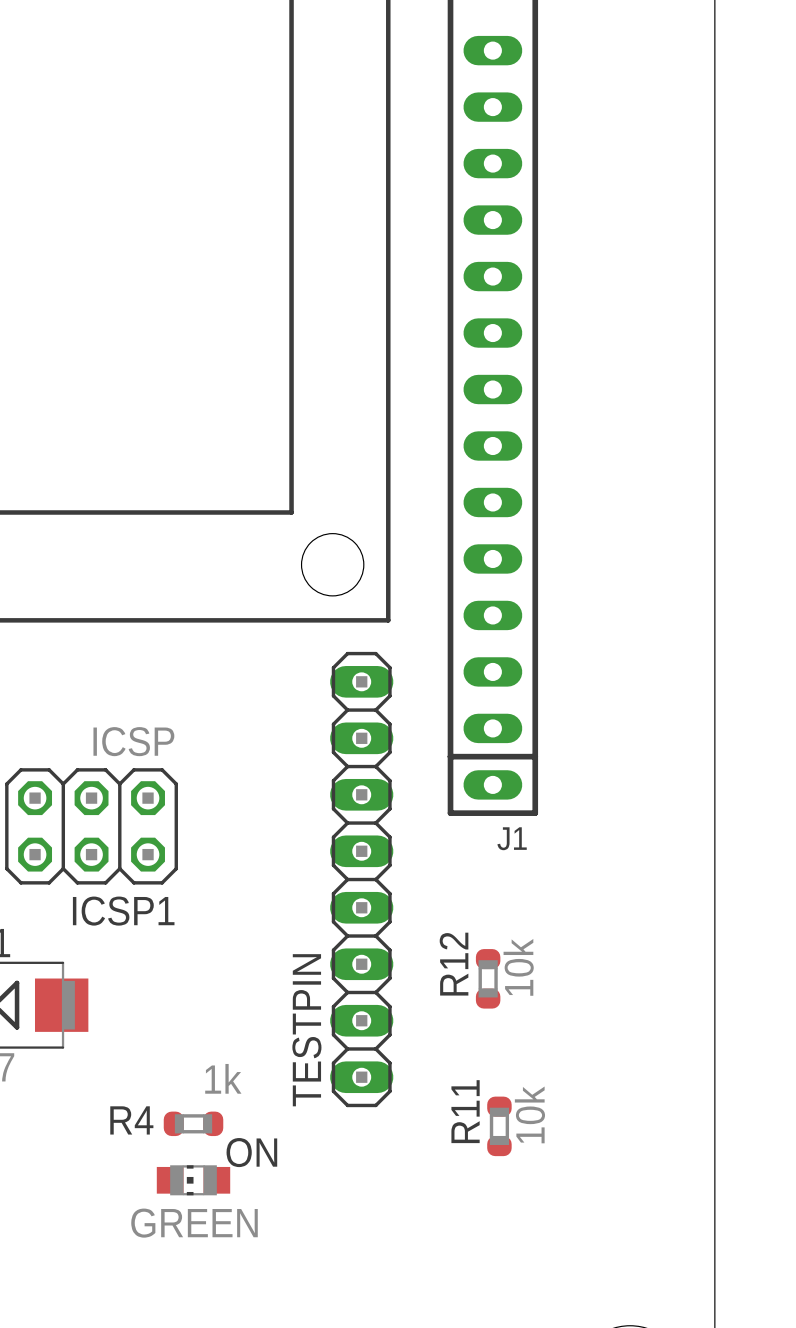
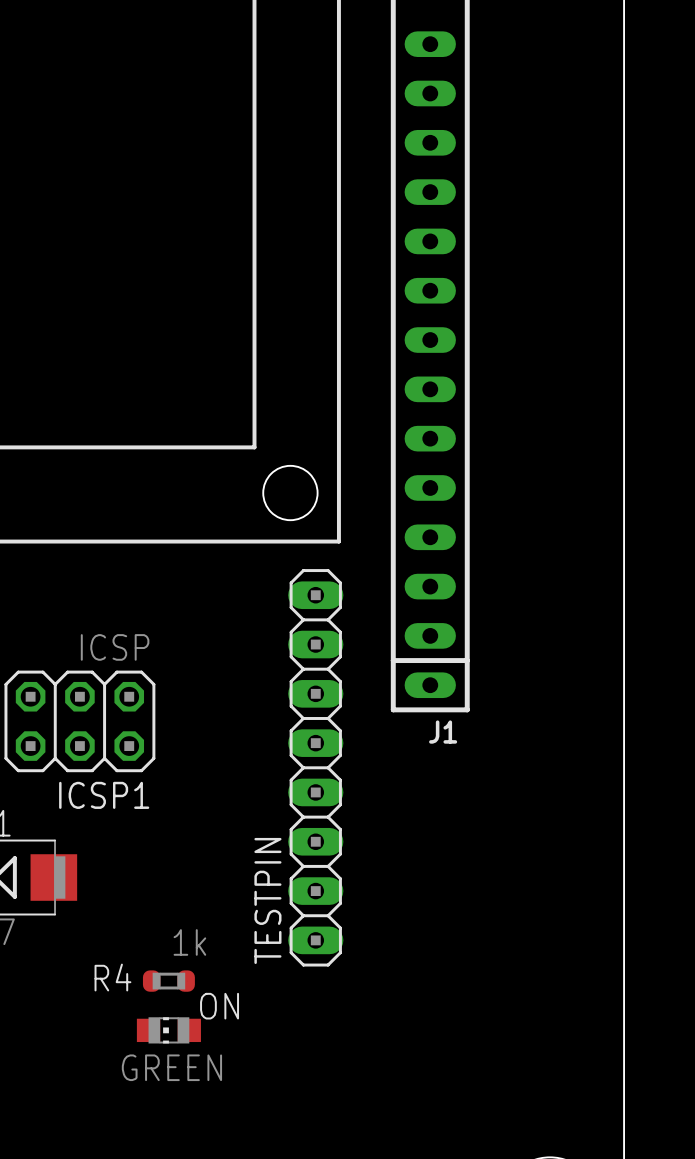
R12: 10k (488, 978) -> none
R11: 10k (499, 1126) -> none

